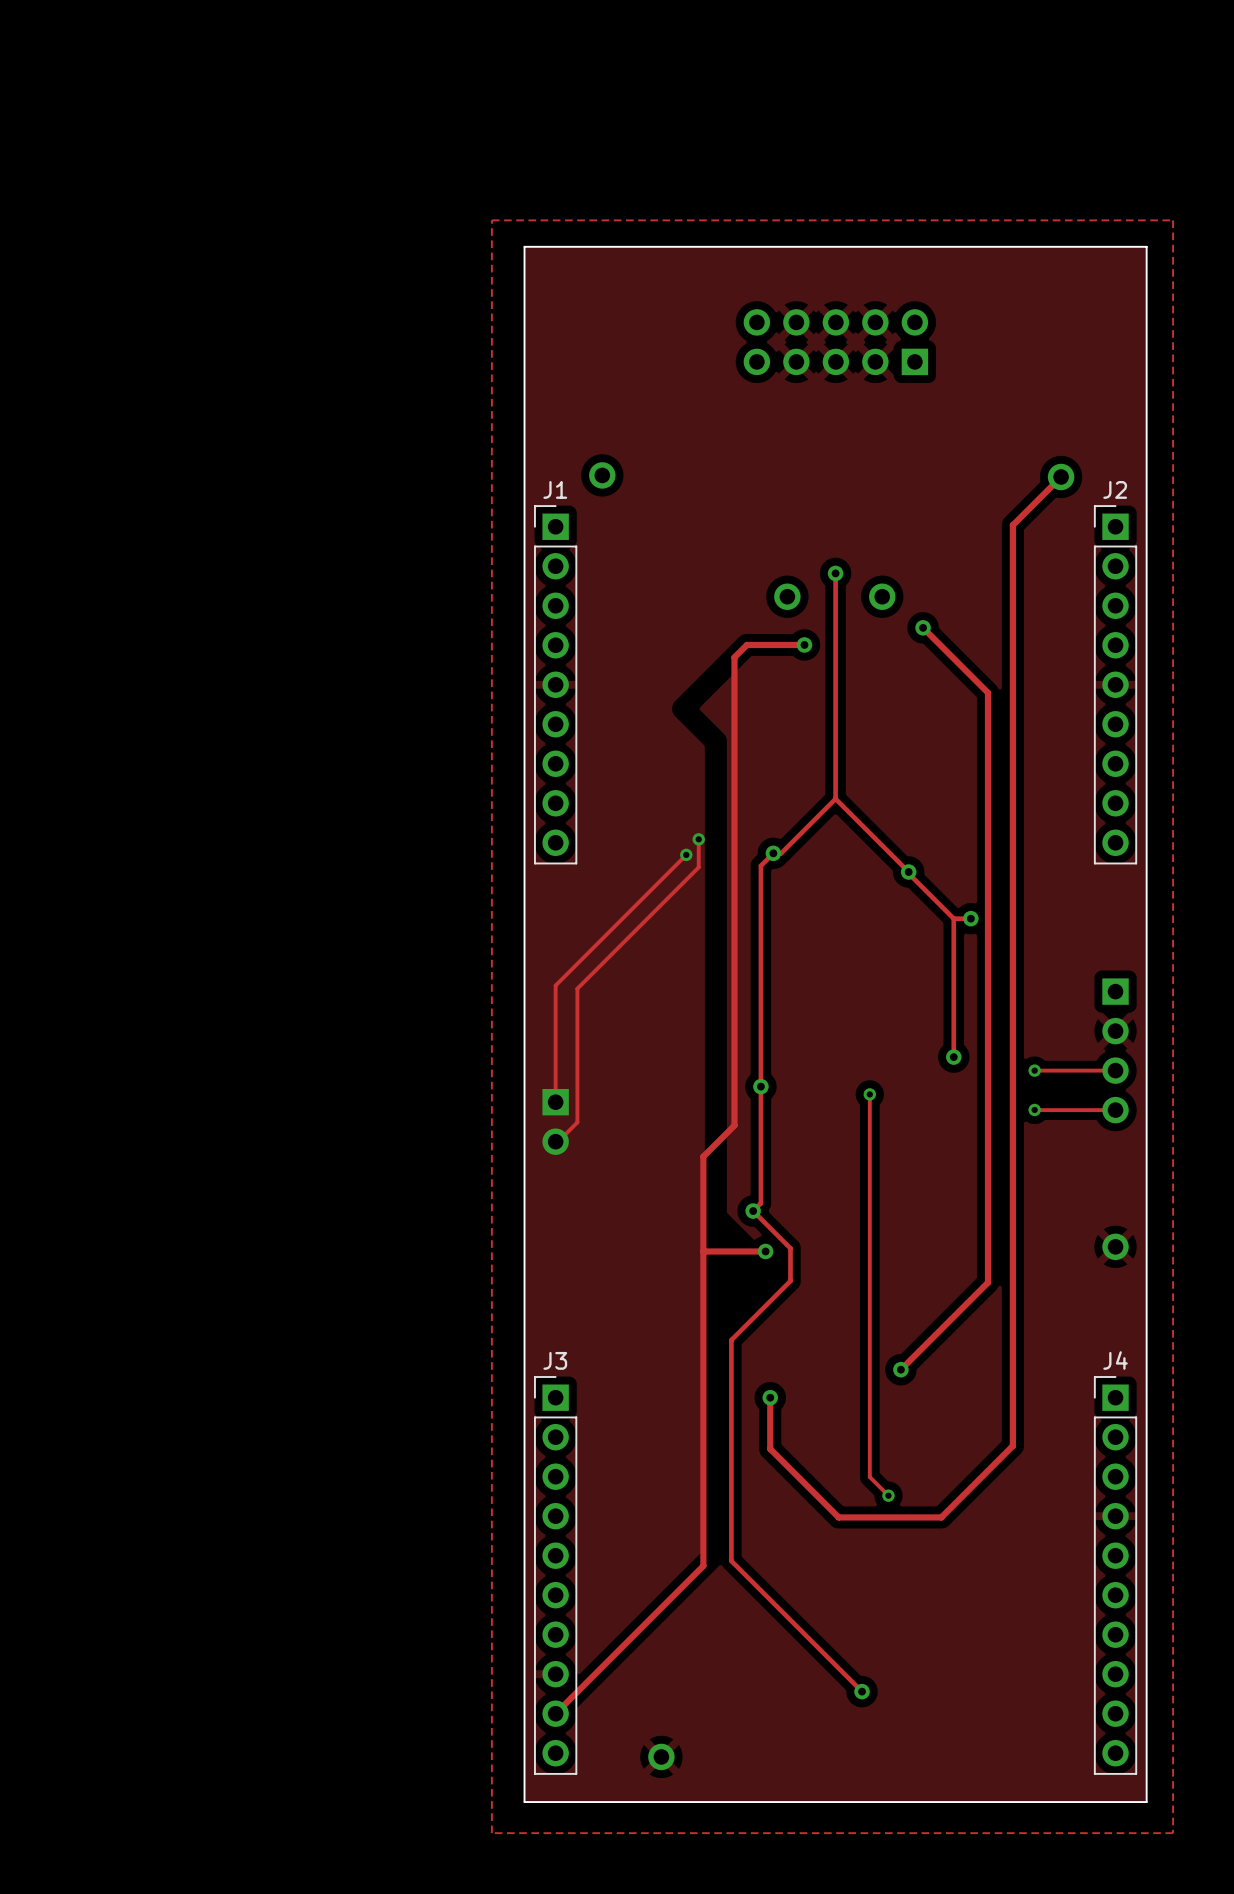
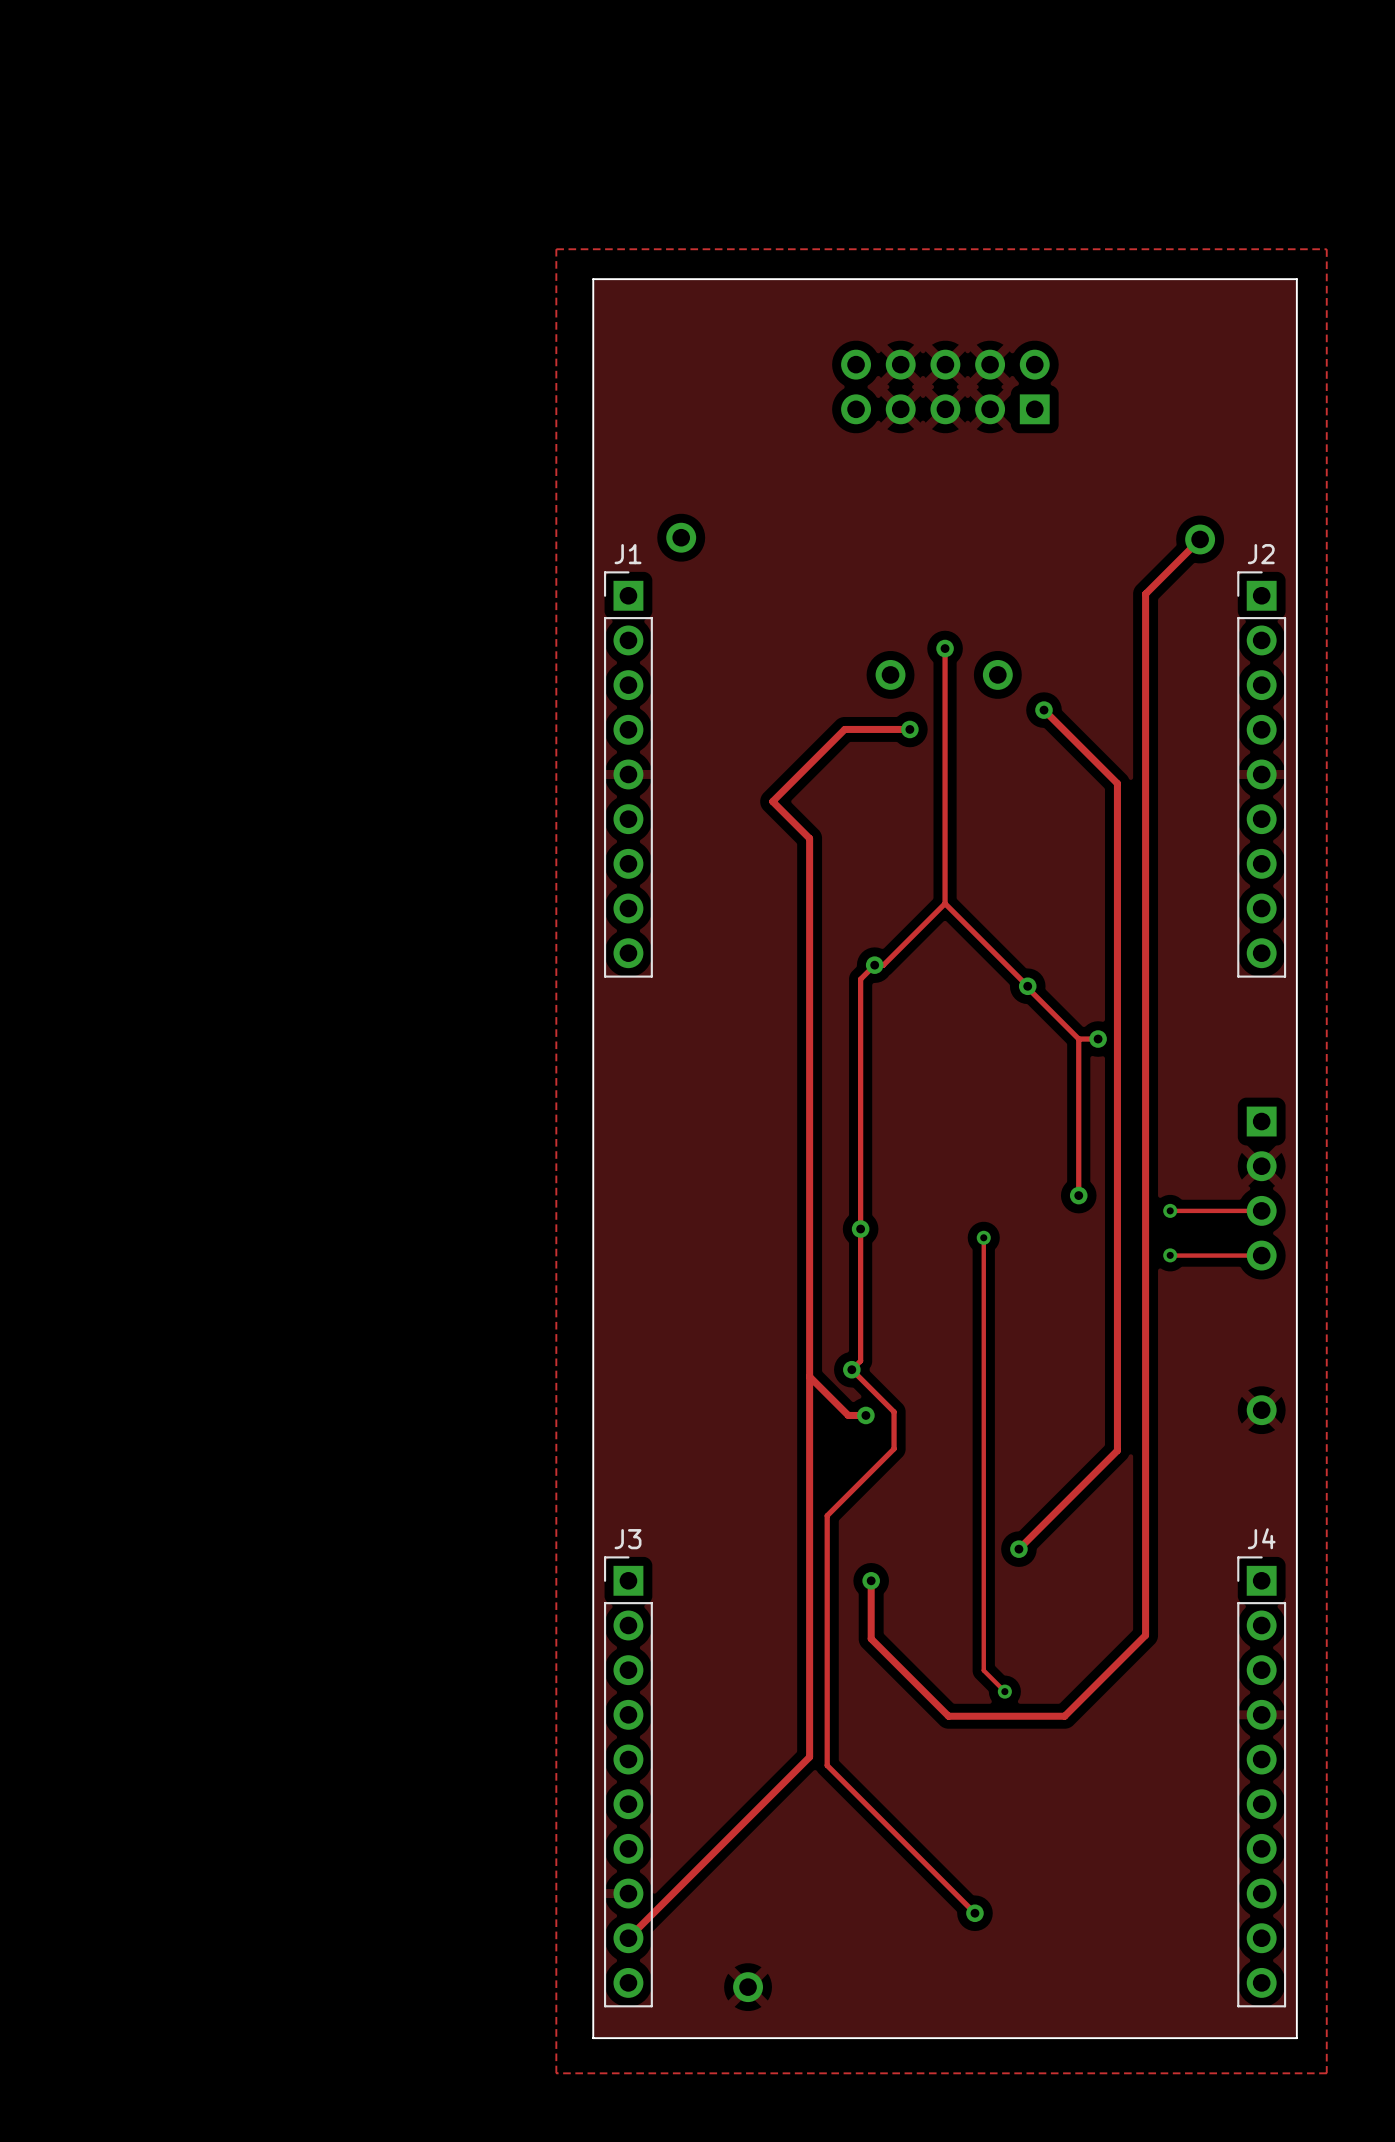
track: (734, 657) (734, 1125) (703, 1156) (703, 1565) -> (830, 743) (772, 801) (809, 838) (809, 1757) (795, 1771)
track: (698, 839) (698, 867) (577, 988) (577, 1122) (558, 1141) (555, 1141) -> none
via: (698, 839) -> none
track: (686, 854) (555, 985) (555, 1102) -> none
via: (686, 854) -> none
part: (555, 1121) -> none
track: (703, 1251) (750, 1251) -> (809, 1376) (848, 1415)

